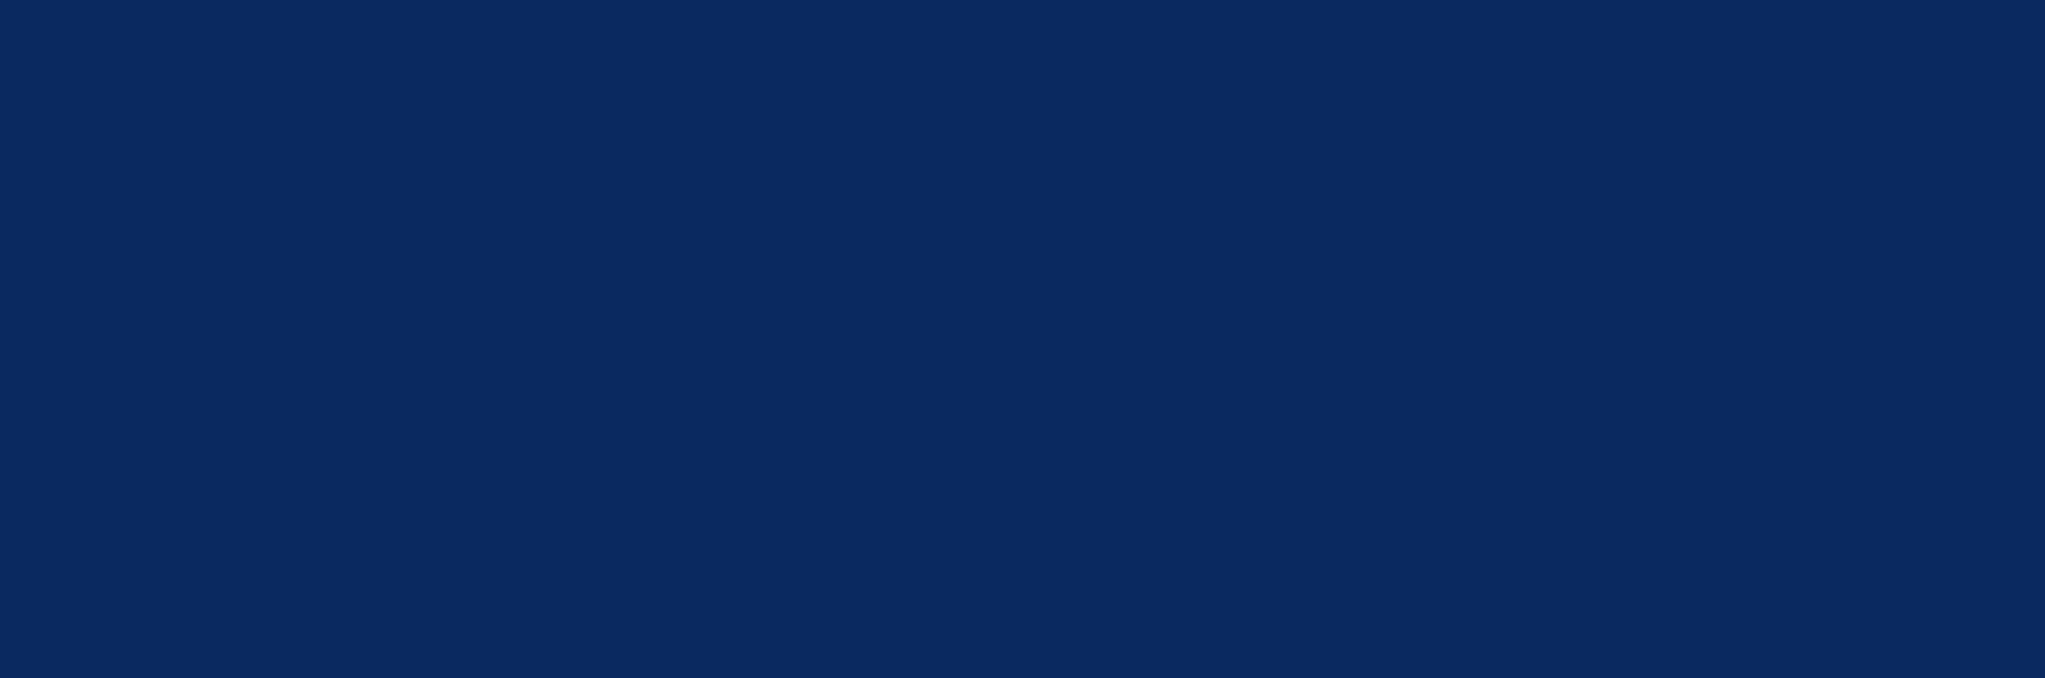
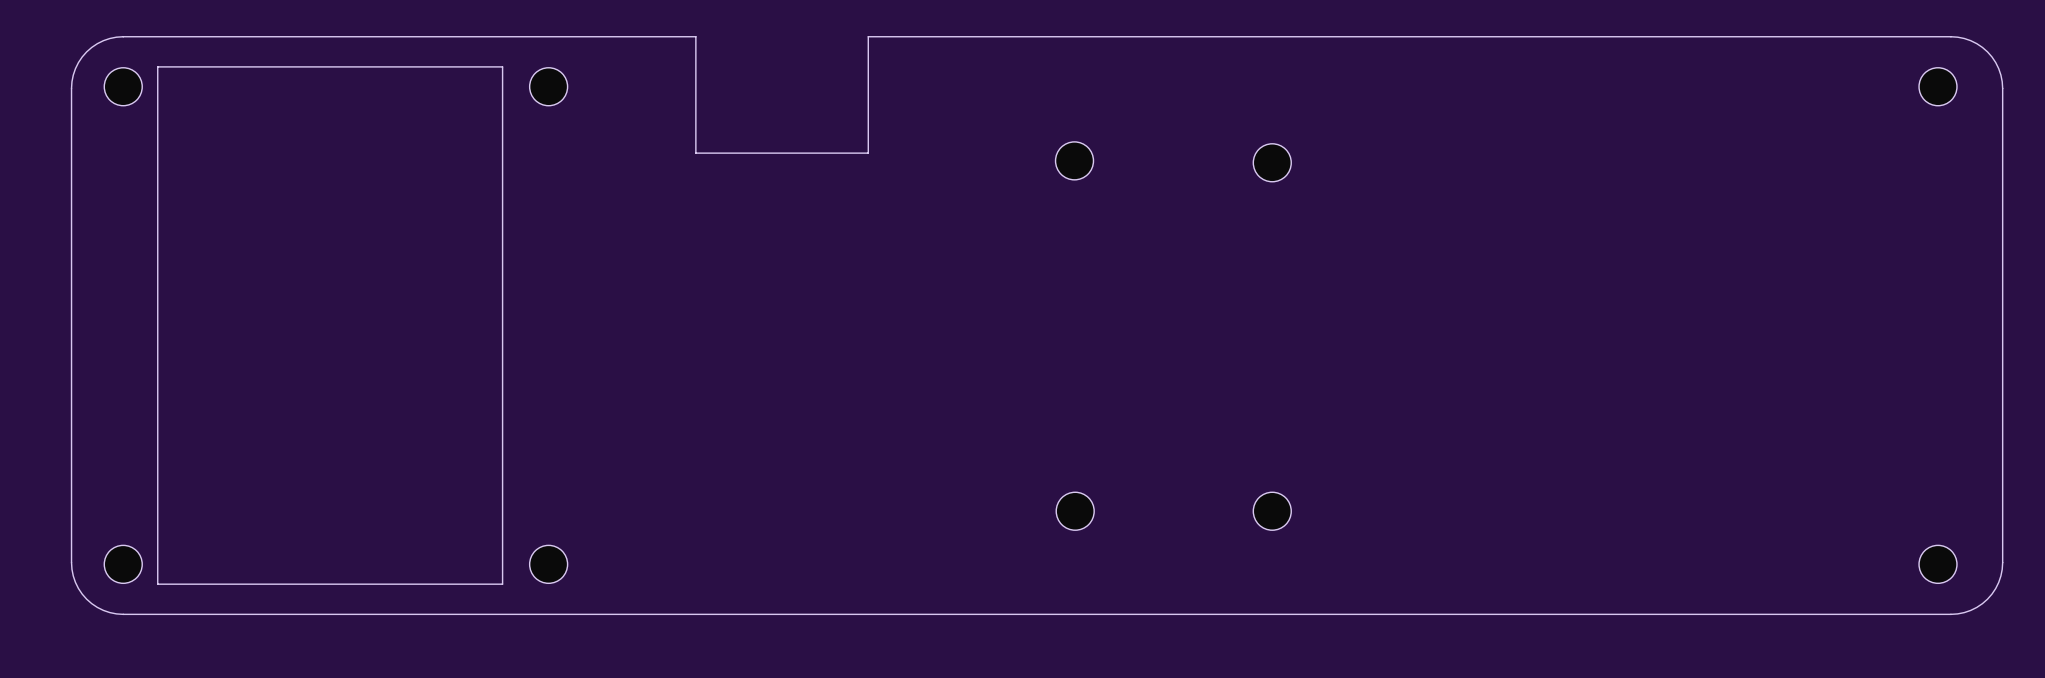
board edge: none -> (123, 36) (695, 36) (695, 153) (868, 153) (868, 36) (1950, 36) (1964, 38) (1982, 47) (1991, 56) (1998, 68) (2002, 81) (2002, 562) (2000, 576) (1991, 594) (1982, 603) (1964, 612) (1950, 614) (123, 614) (109, 612) (97, 607) (86, 599) (75, 582) (71, 569) (71, 88) (75, 68) (86, 51) (103, 40) (123, 36)
board edge: none -> (157, 66) (502, 66) (502, 584) (157, 584) (157, 66)
part: none -> (123, 86)
part: none -> (548, 86)
part: none -> (1938, 86)
part: none -> (1074, 160)
part: none -> (1272, 162)
part: none -> (1075, 511)
part: none -> (1272, 511)
part: none -> (123, 564)
part: none -> (548, 564)
part: none -> (1938, 564)

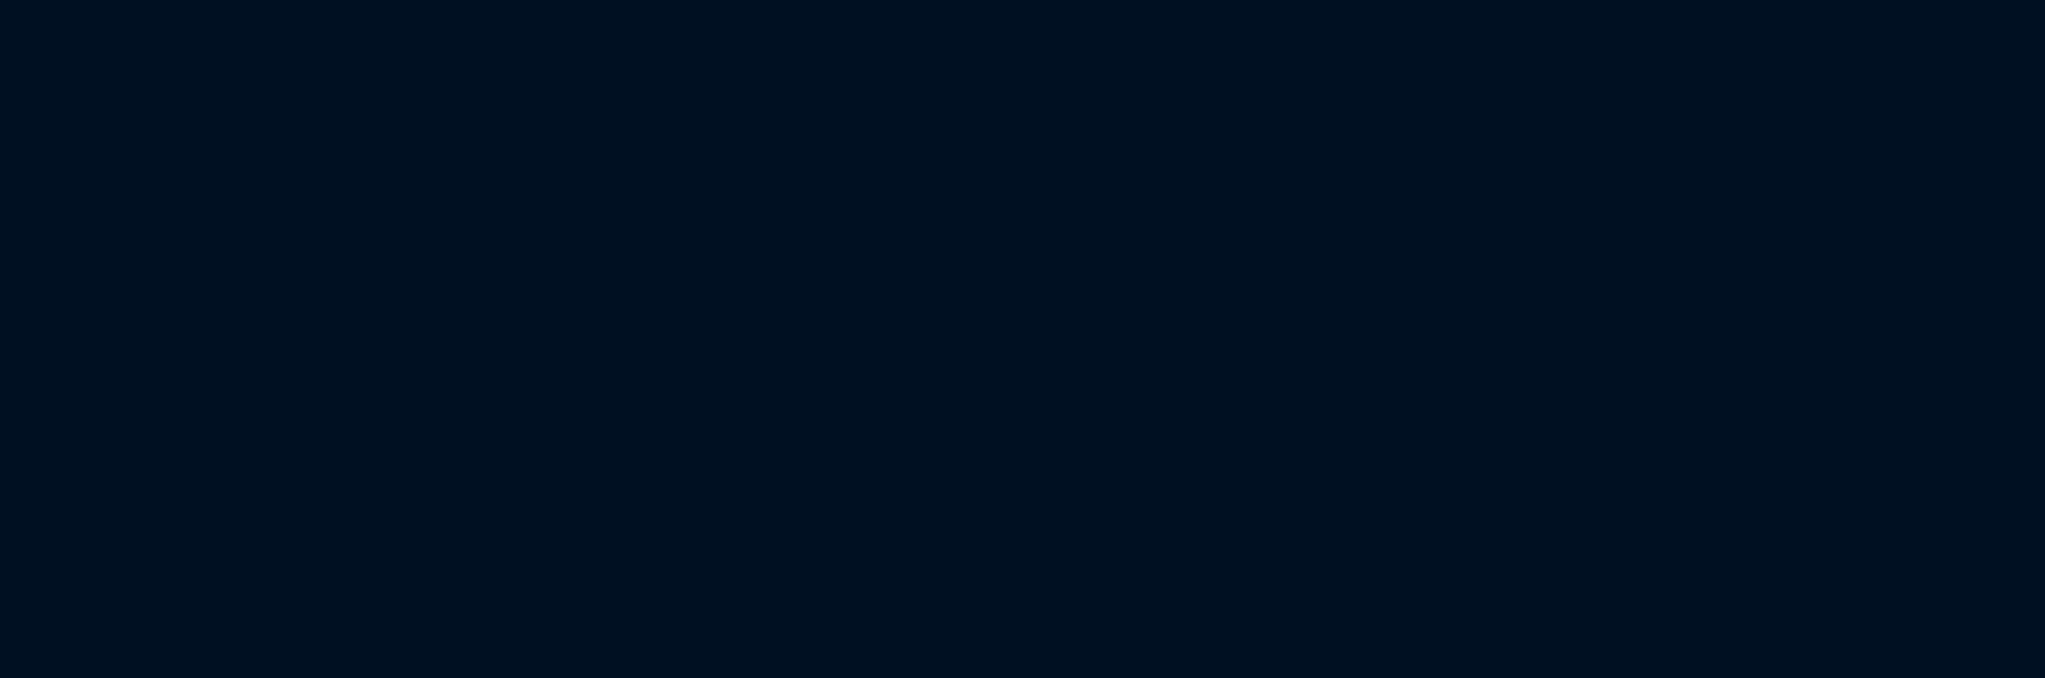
board edge: (123, 36) (695, 36) (695, 153) (868, 153) (868, 36) (1950, 36) (1964, 38) (1982, 47) (1991, 56) (1998, 68) (2002, 81) (2002, 562) (2000, 576) (1991, 594) (1982, 603) (1964, 612) (1950, 614) (123, 614) (109, 612) (97, 607) (86, 599) (75, 582) (71, 569) (71, 88) (75, 68) (86, 51) (103, 40) (123, 36) -> none
board edge: (157, 66) (502, 66) (502, 584) (157, 584) (157, 66) -> none
part: (123, 86) -> none
part: (548, 86) -> none
part: (1938, 86) -> none
part: (1074, 160) -> none
part: (1272, 162) -> none
part: (1075, 511) -> none
part: (1272, 511) -> none
part: (123, 564) -> none
part: (548, 564) -> none
part: (1938, 564) -> none

